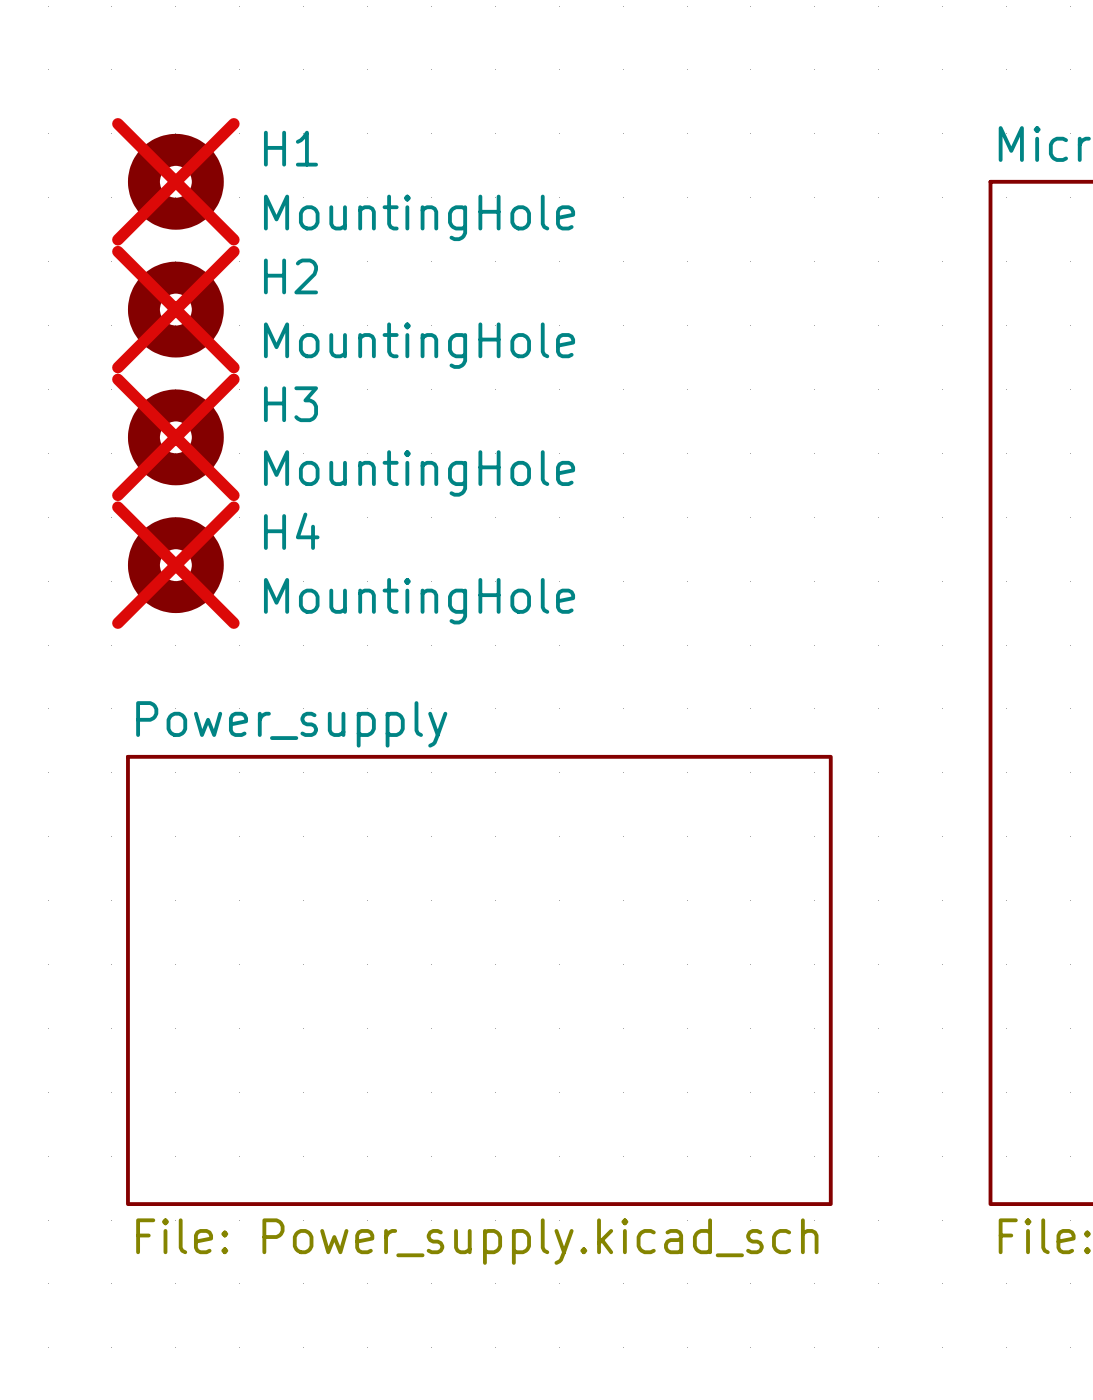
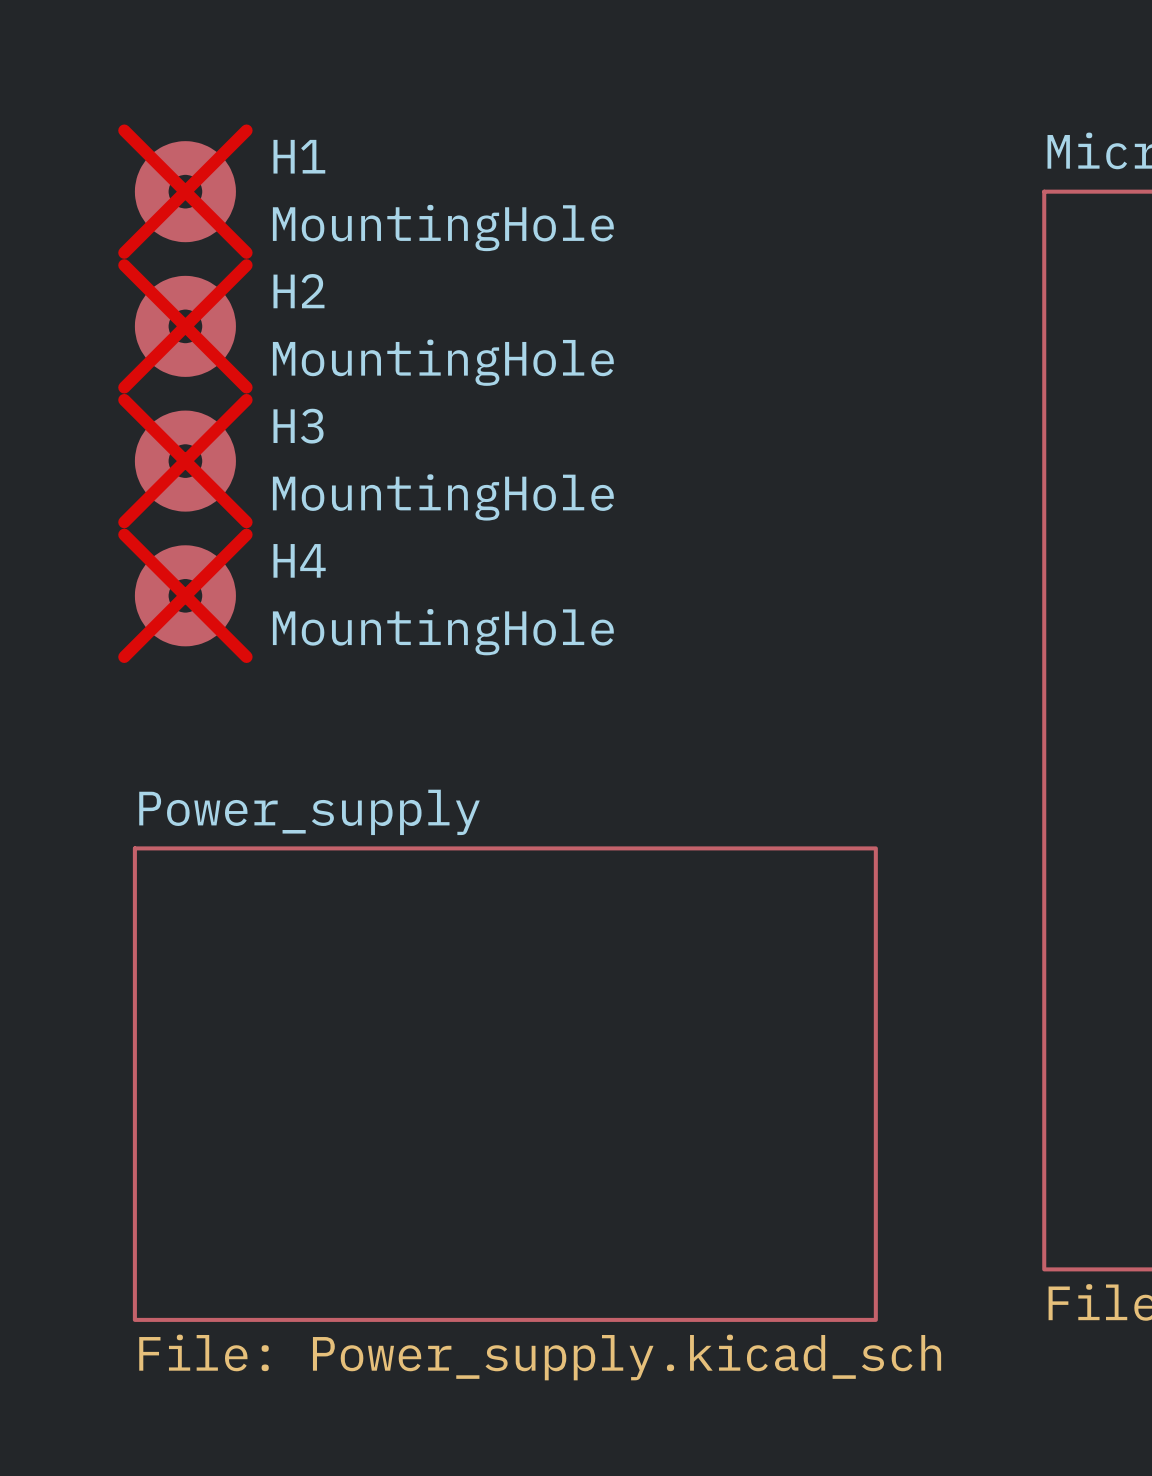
sheet Power_supply position: (479, 980) -> (505, 1084)

